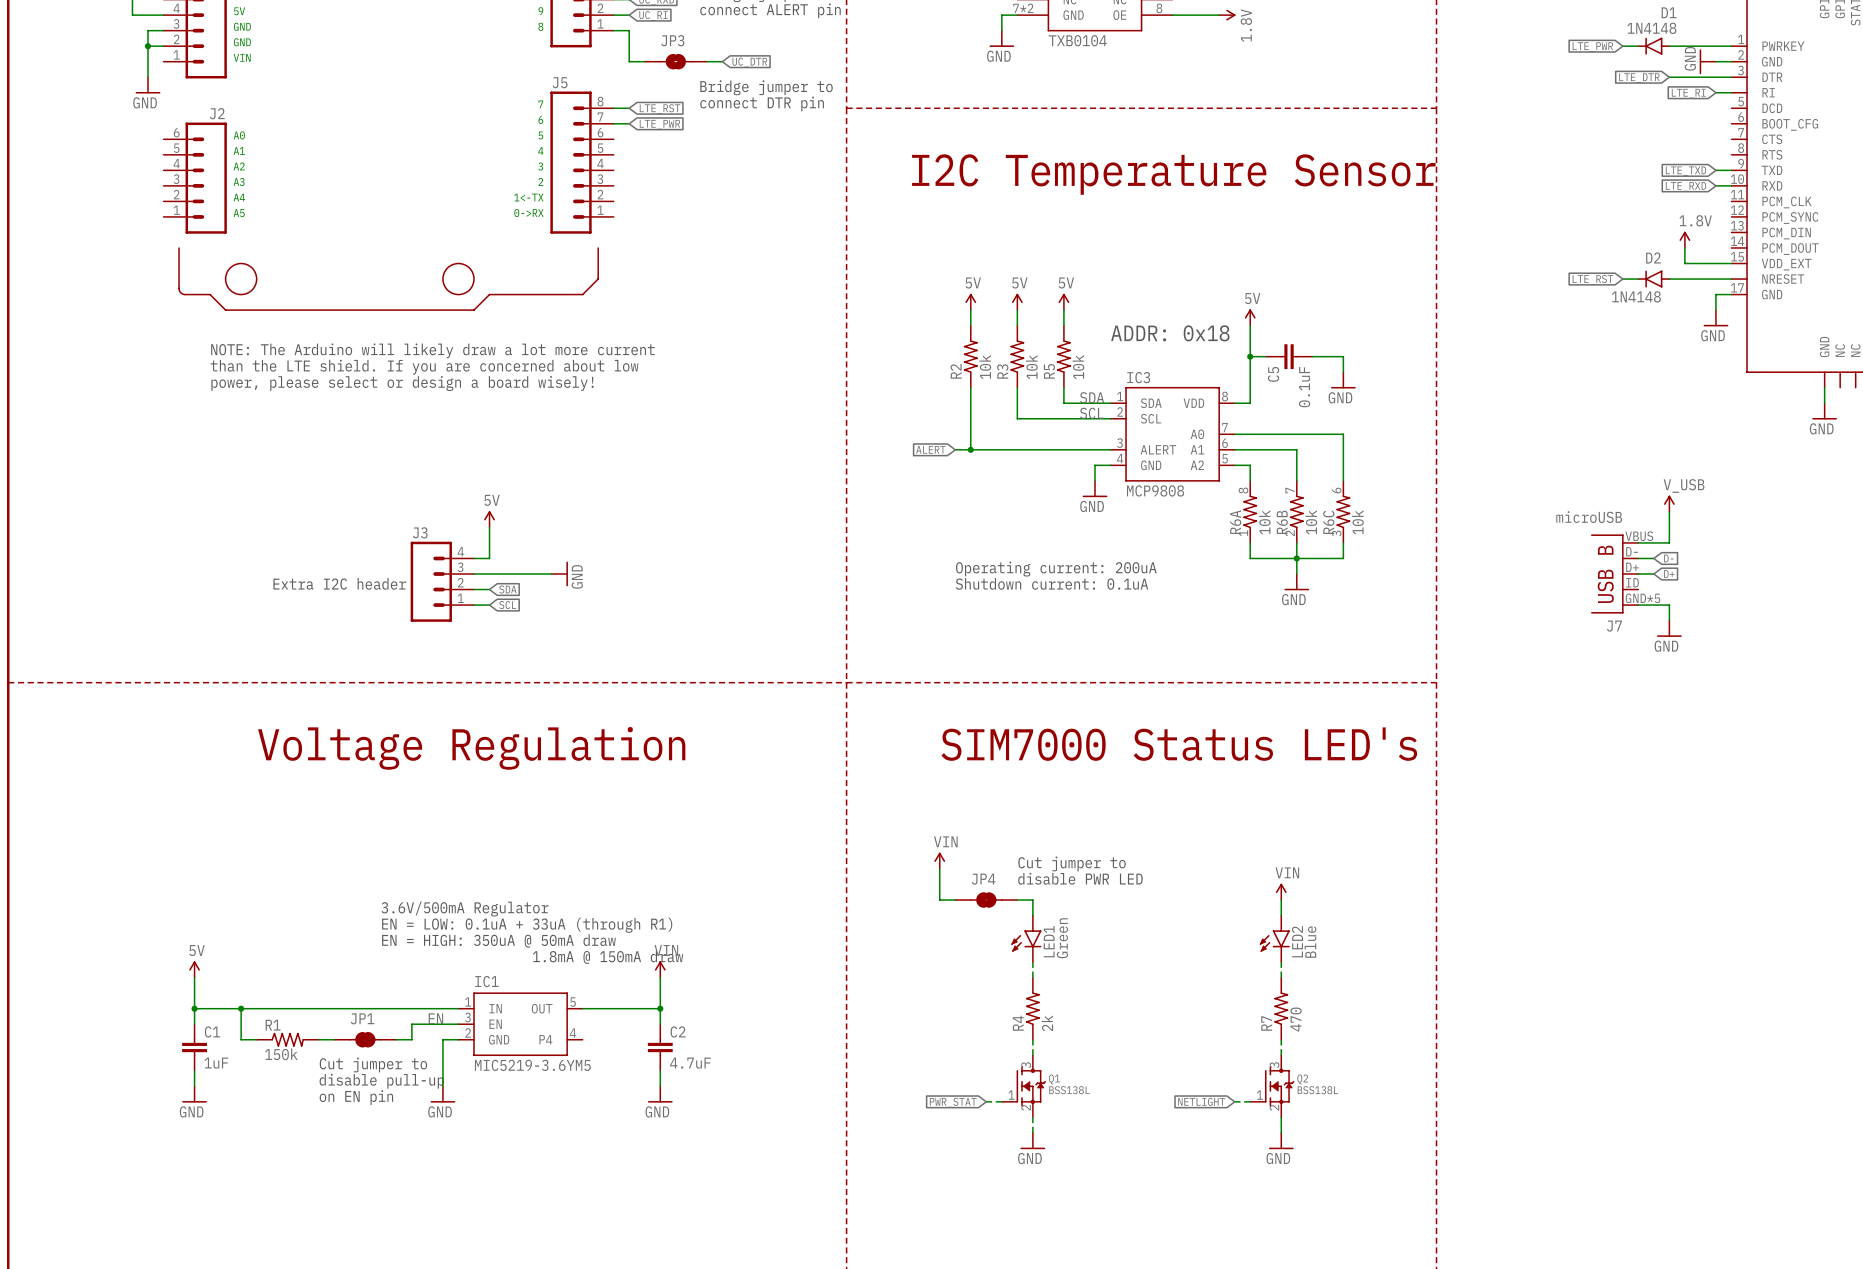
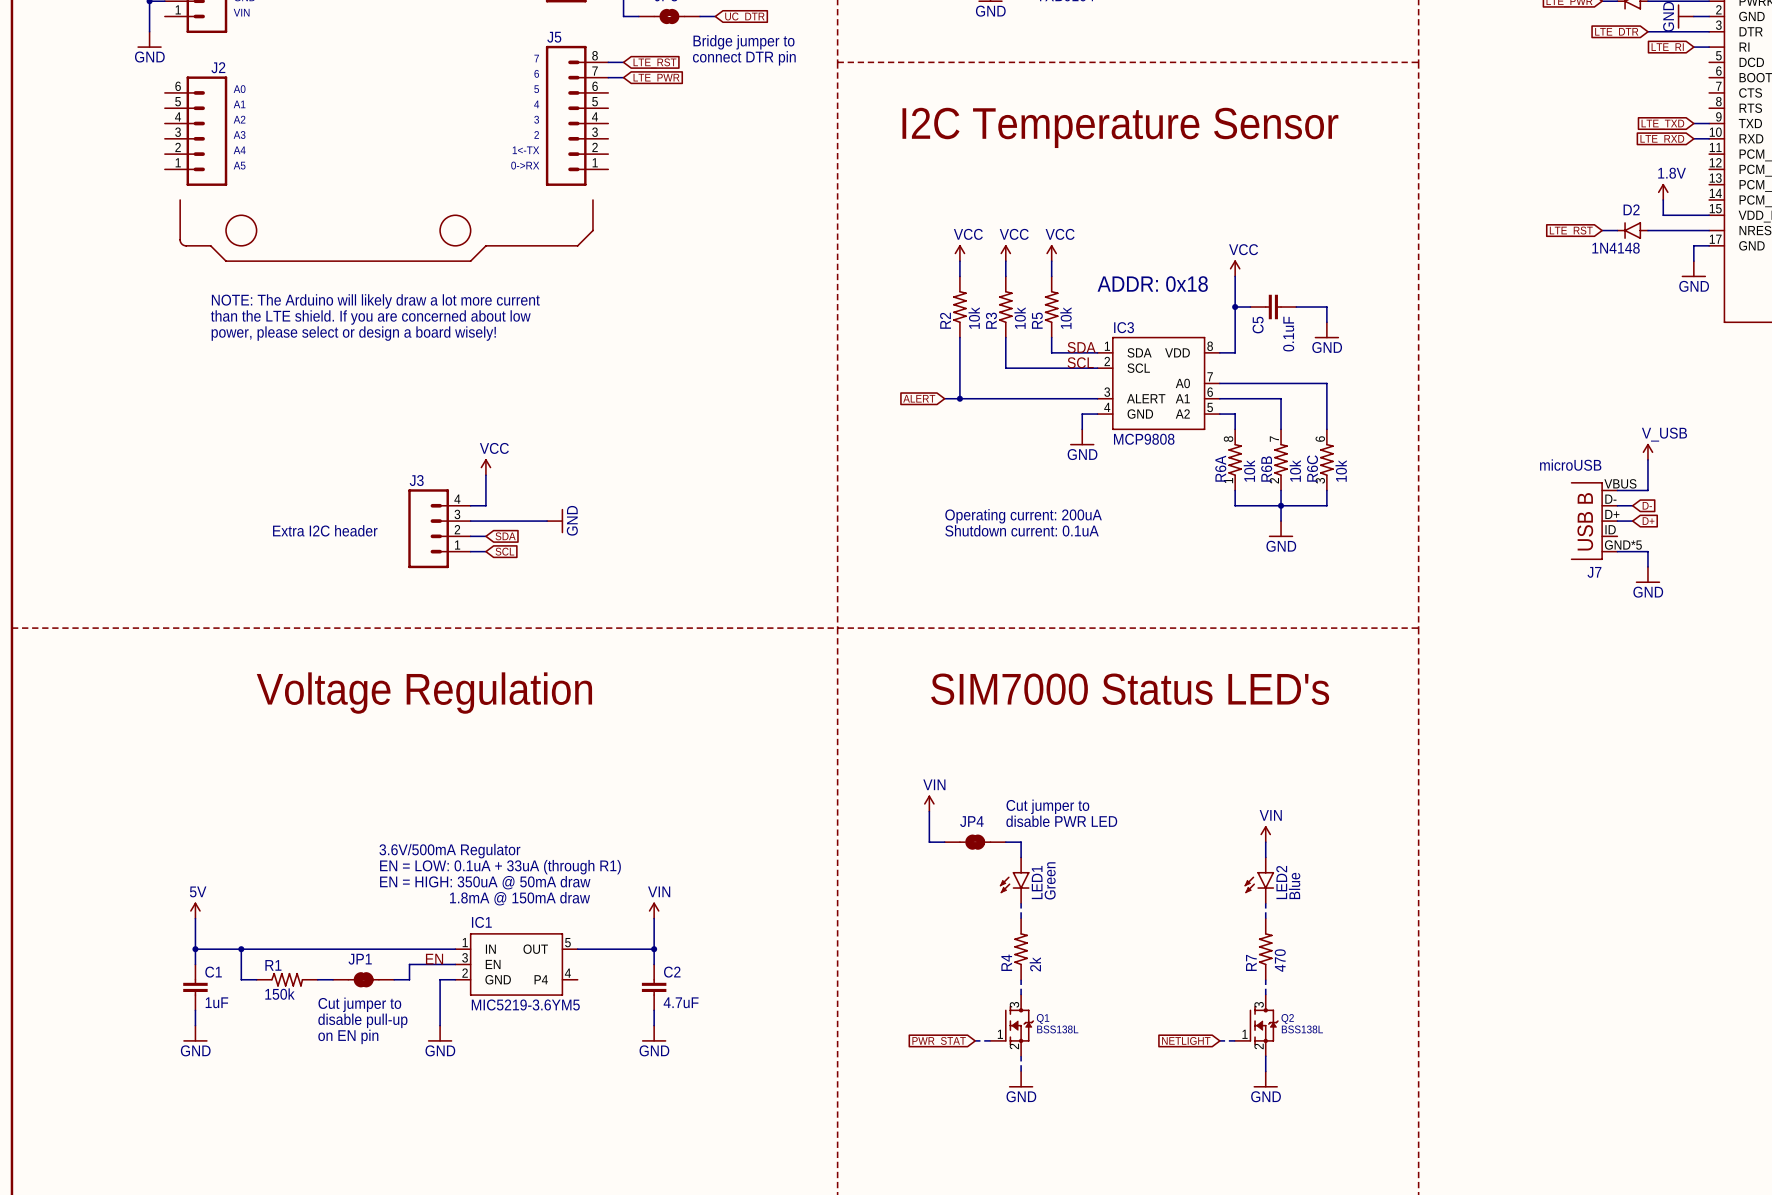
power symbol: 5V (970, 301) -> VCC (959, 253)
power symbol: 5V (1017, 301) -> VCC (1005, 253)
power symbol: 5V (1063, 301) -> VCC (1051, 253)
power symbol: 5V (1250, 317) -> VCC (1235, 268)
power symbol: 5V (489, 519) -> VCC (485, 467)

